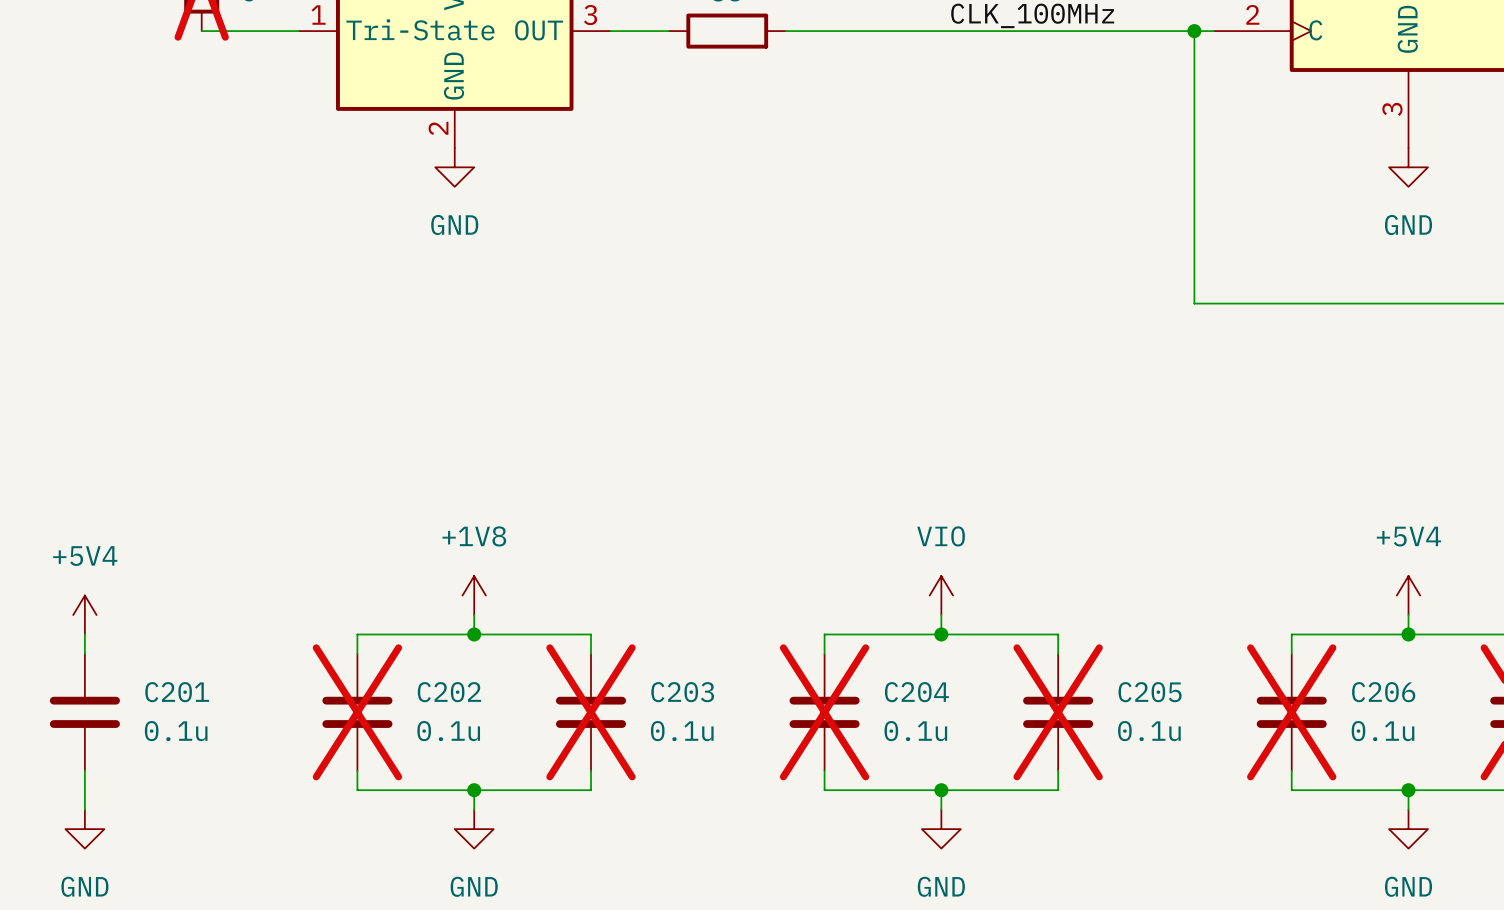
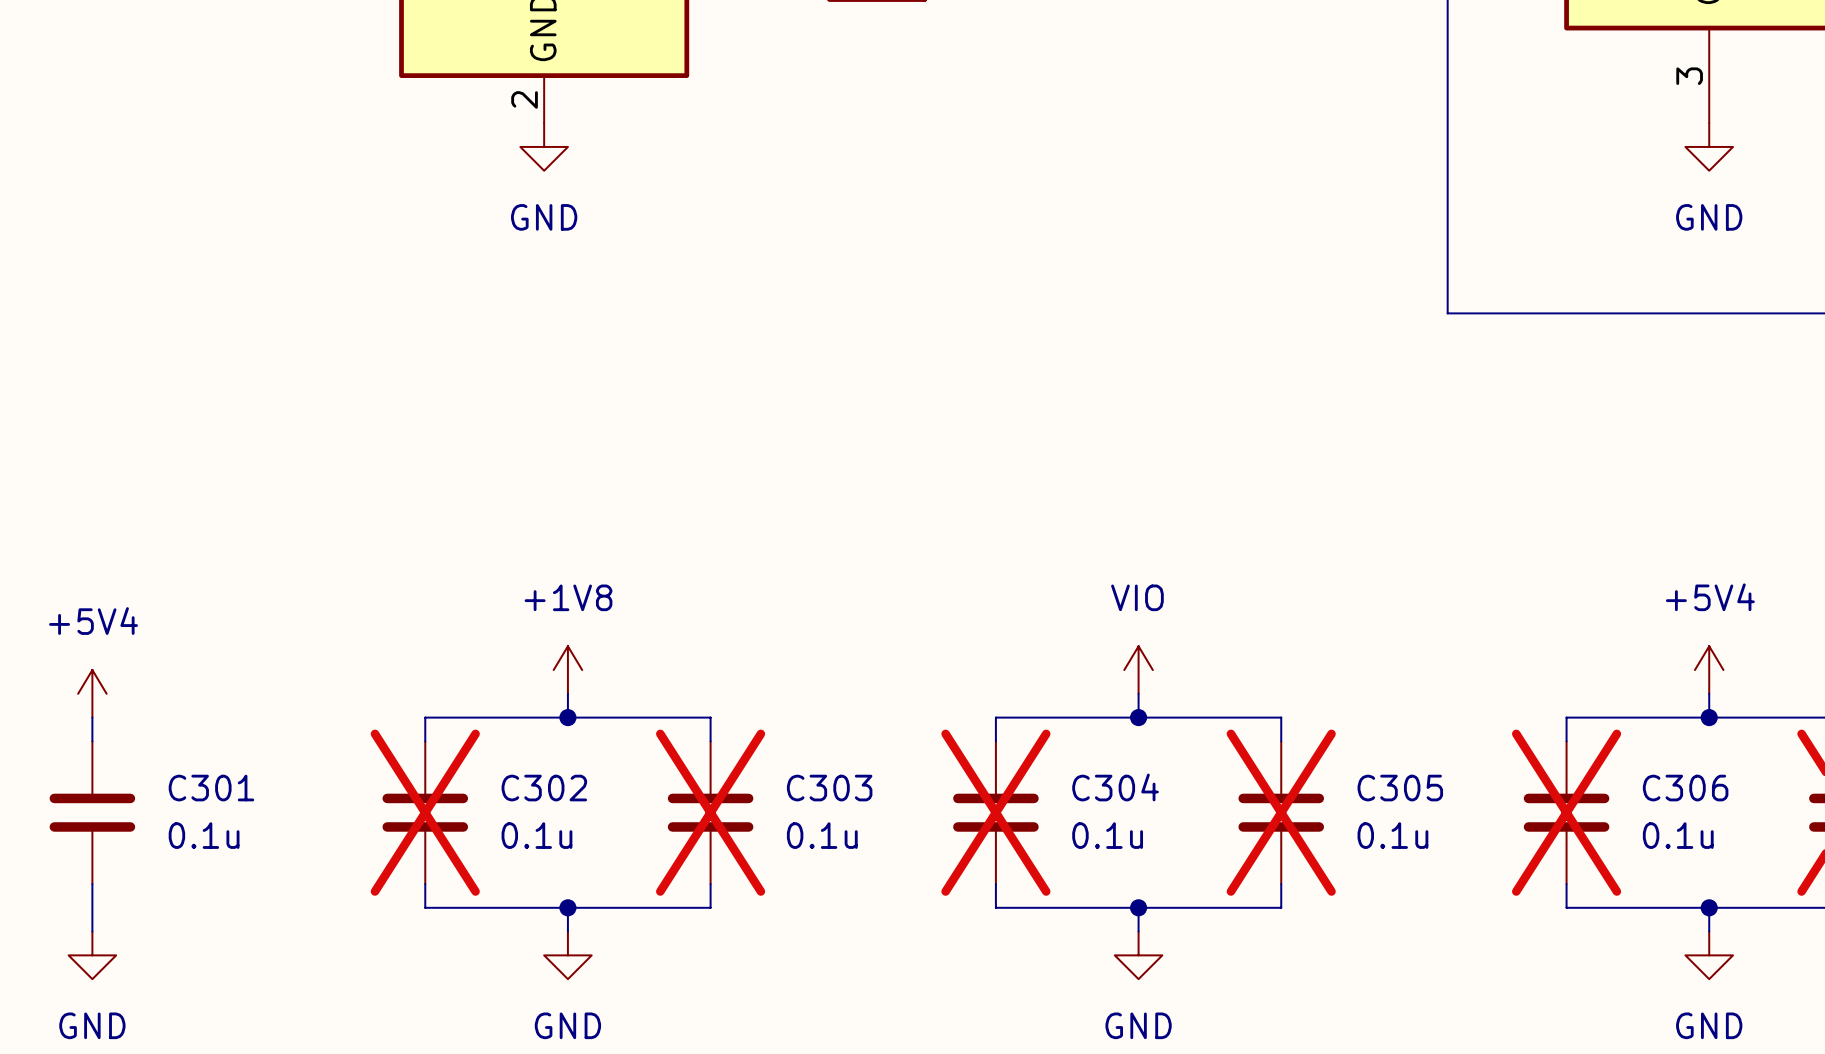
C201 name: C201 (177, 692) -> C301 (211, 788)
C202 name: C202 (449, 692) -> C302 (544, 788)
C203 name: C203 (682, 692) -> C303 (829, 788)
C204 name: C204 (916, 692) -> C304 (1115, 787)
C205 name: C205 (1150, 692) -> C305 (1400, 788)
C206 name: C206 (1383, 692) -> C306 (1685, 788)

